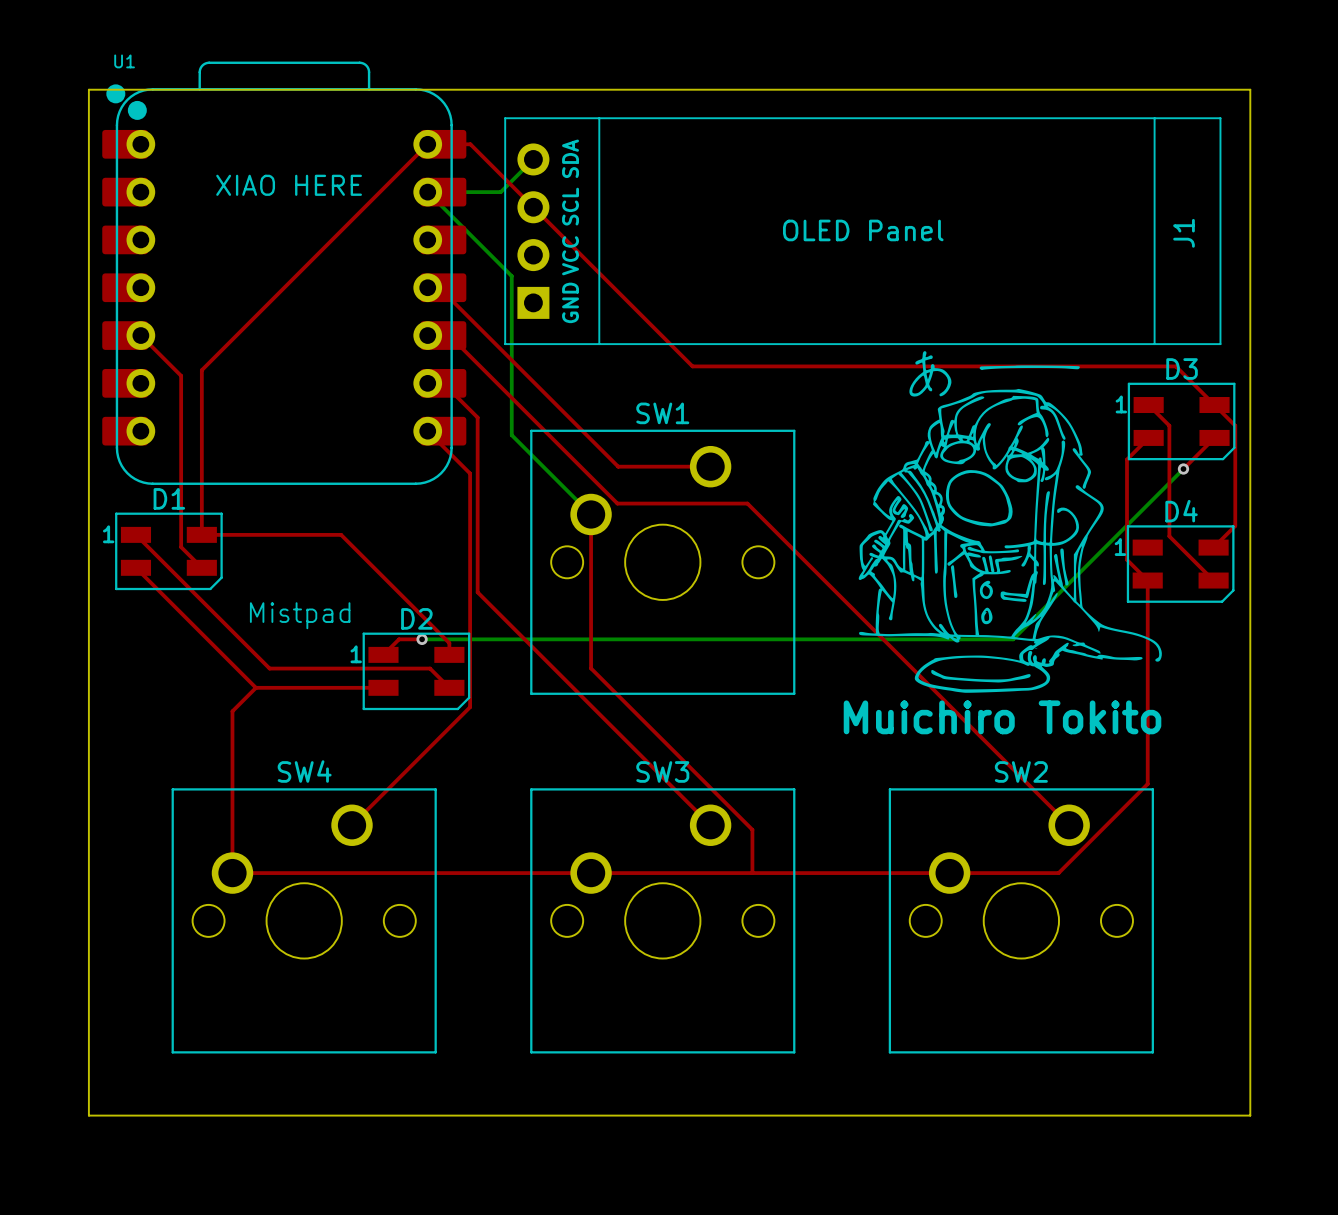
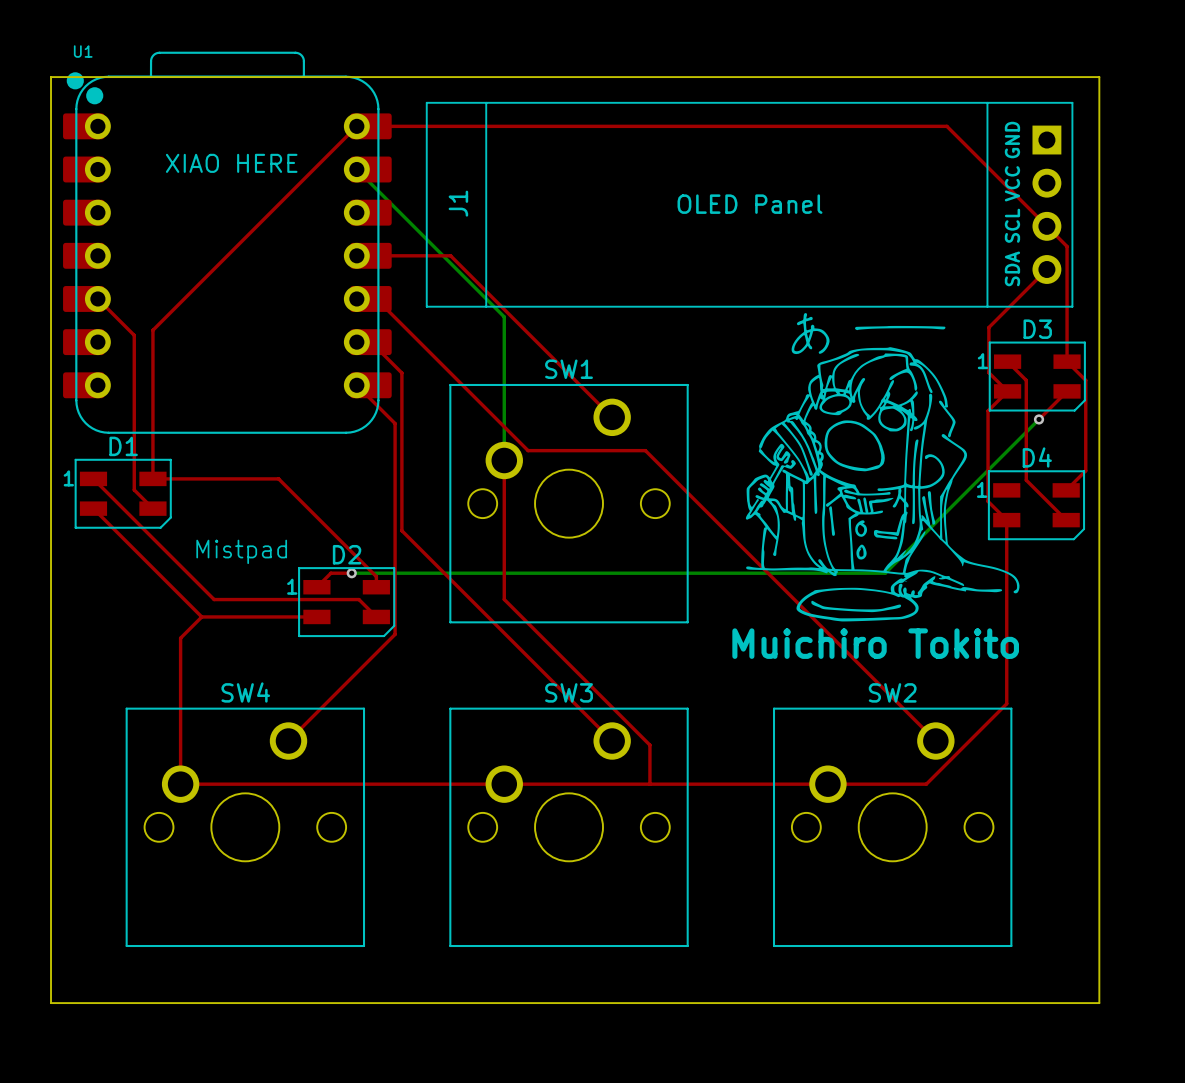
top track: (470, 144) (692, 366) (1175, 366) (1214, 405) -> (395, 126) (946, 126) (1067, 246) (1067, 361)
bottom track: (533, 159) (500, 192) (427, 192) -> none
J1 rotation: 0° (862, 231) -> 180° (749, 204)
bottom track: (511, 276) (511, 435) (591, 514) -> (432, 245) (504, 316) (504, 460)
top track: (439, 287) (618, 466) (710, 466) -> (367, 255) (450, 255) (612, 417)
top track: none -> (1046, 269) (988, 327) (988, 372) (1007, 391)

